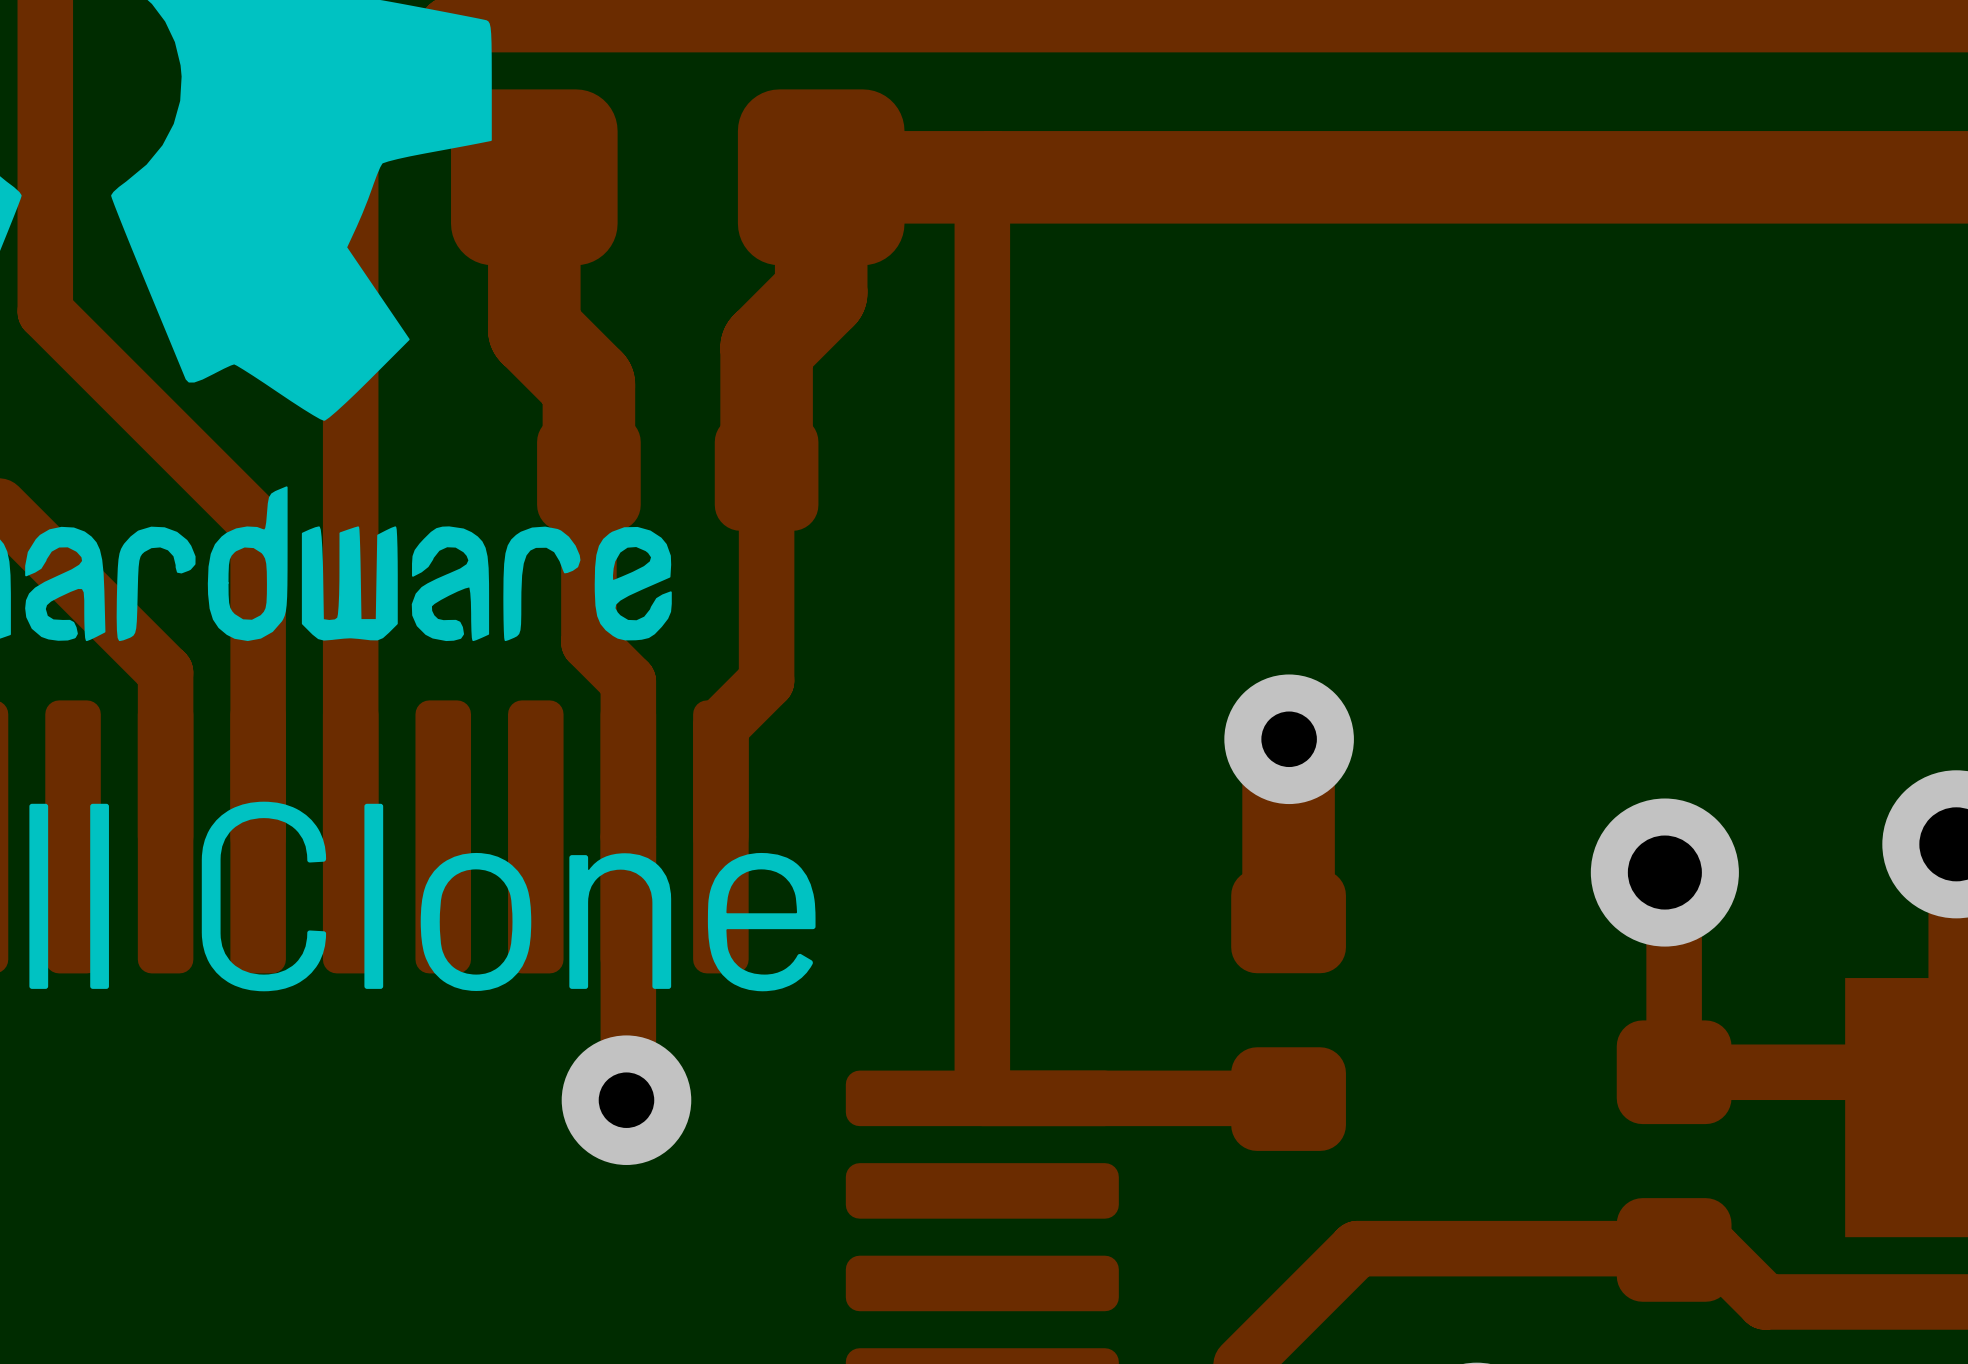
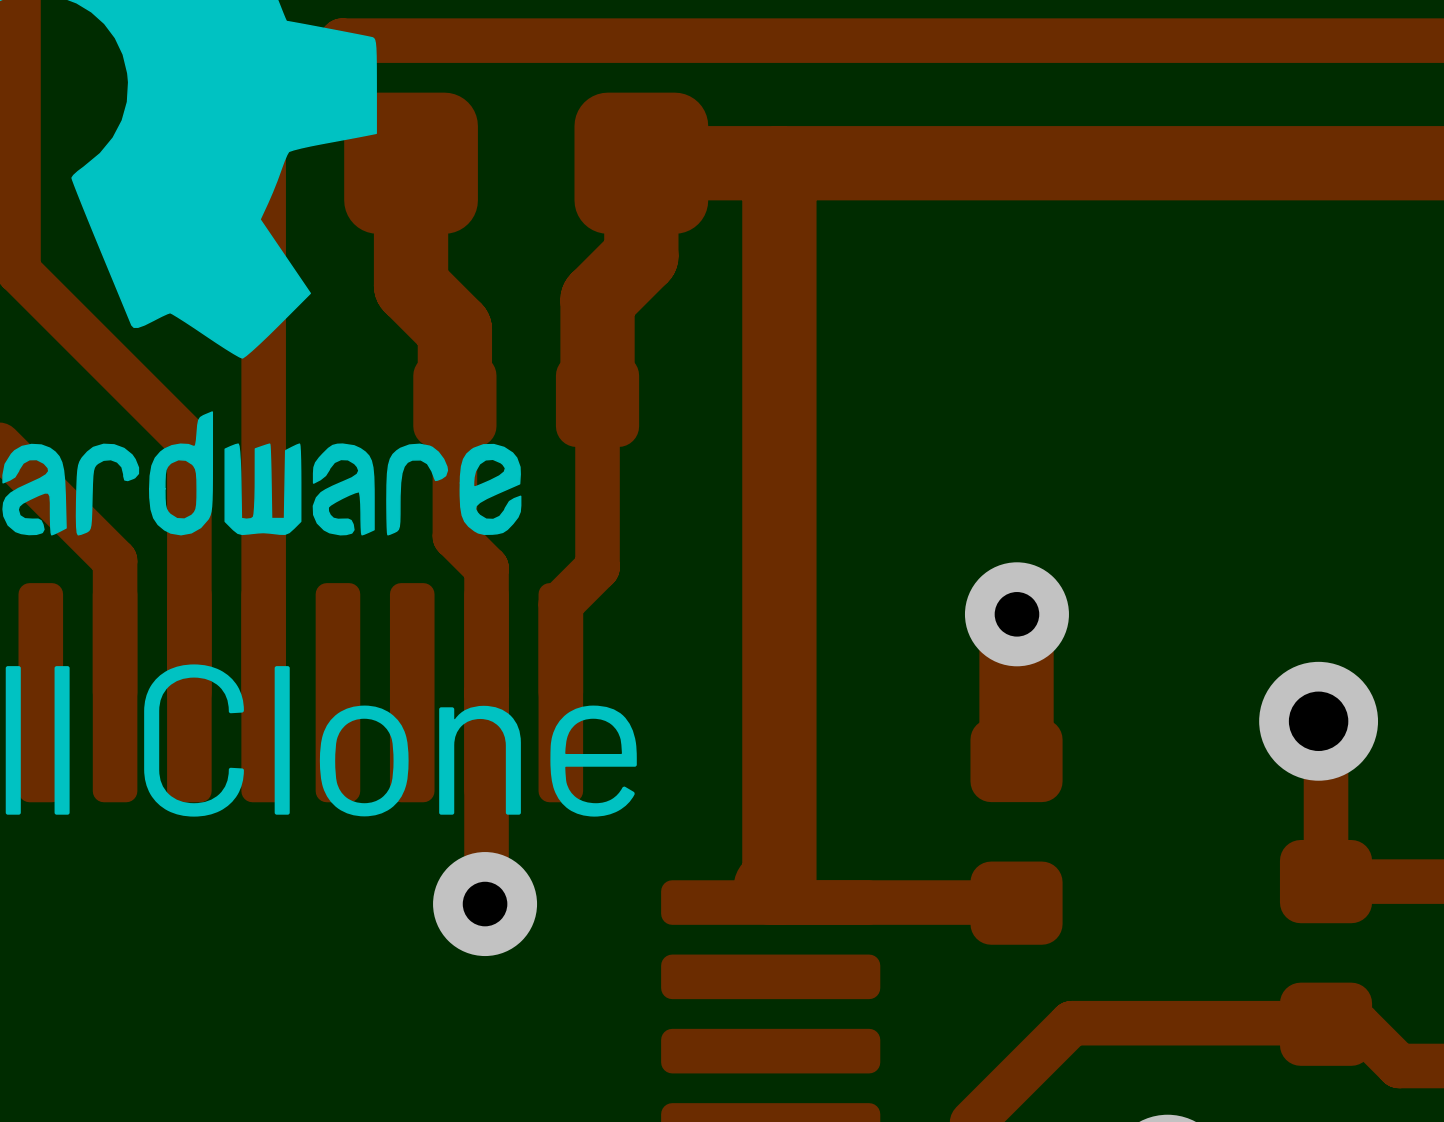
top track: (993, 177) (982, 188) (982, 1098) -> (779, 163) (779, 887) (770, 887)

